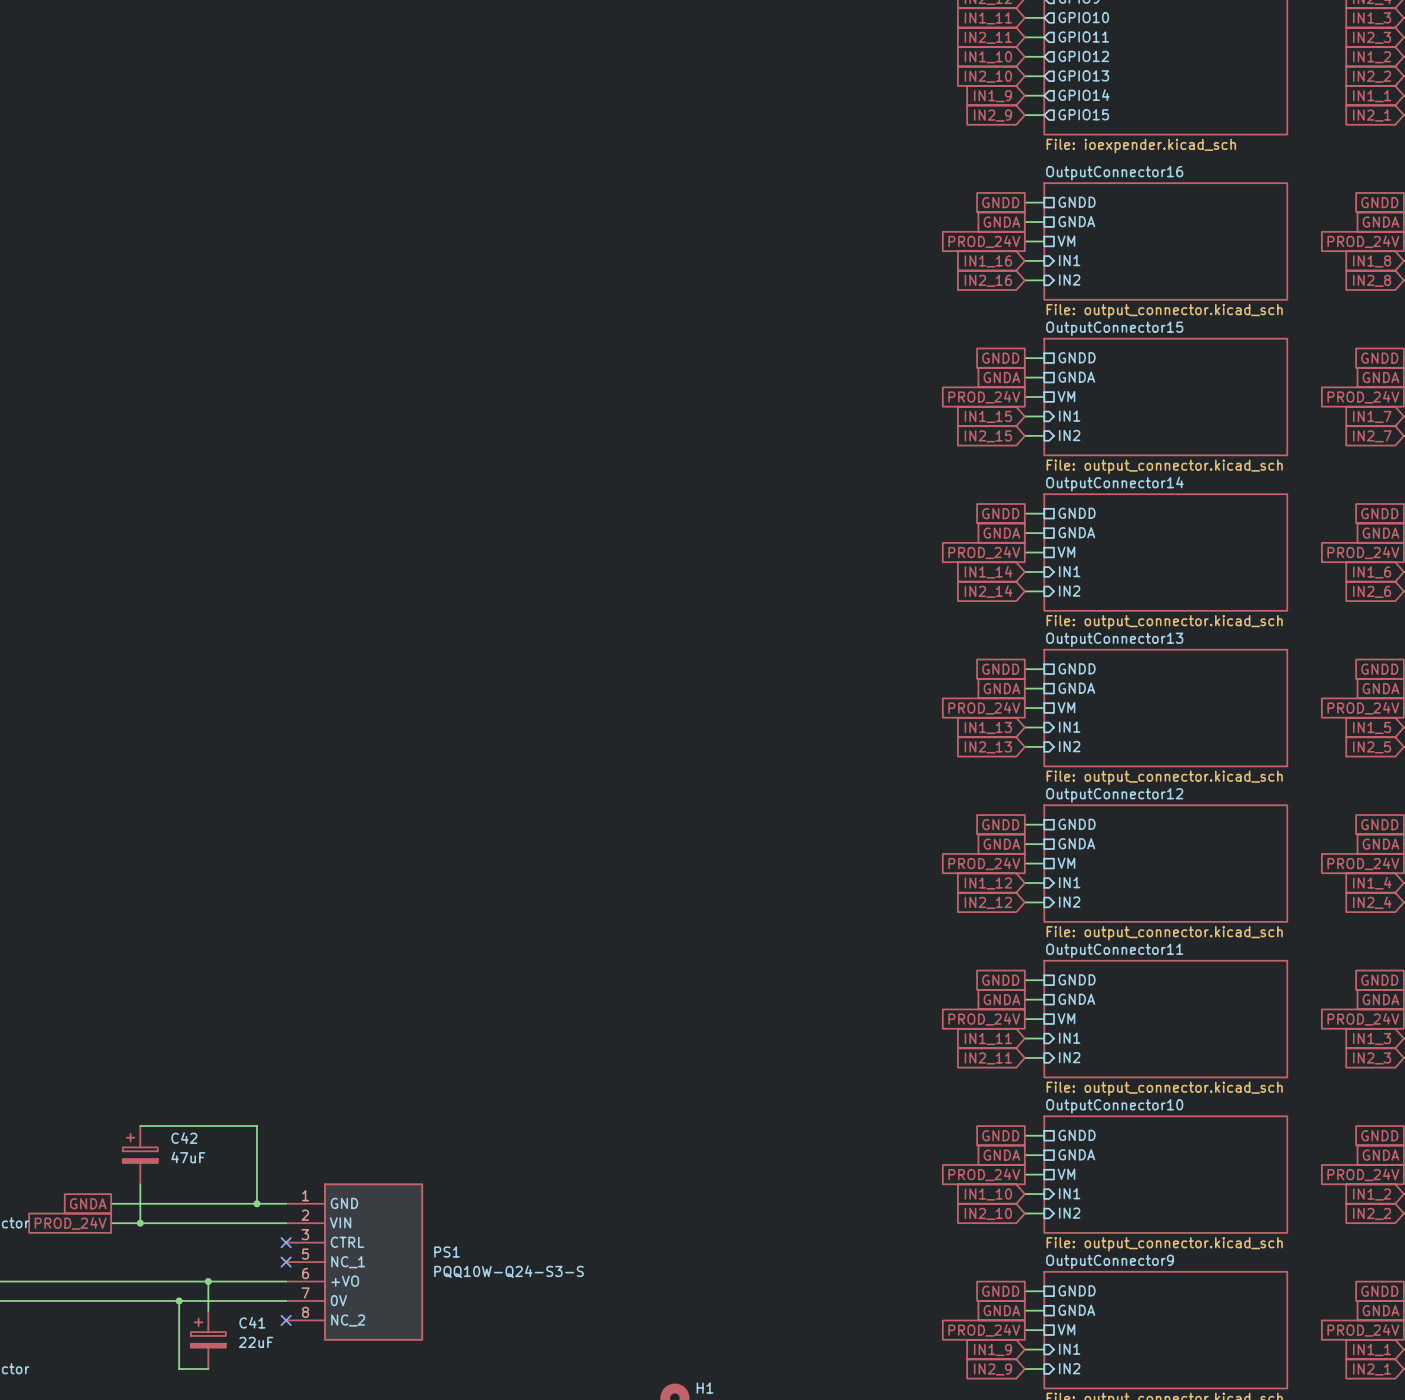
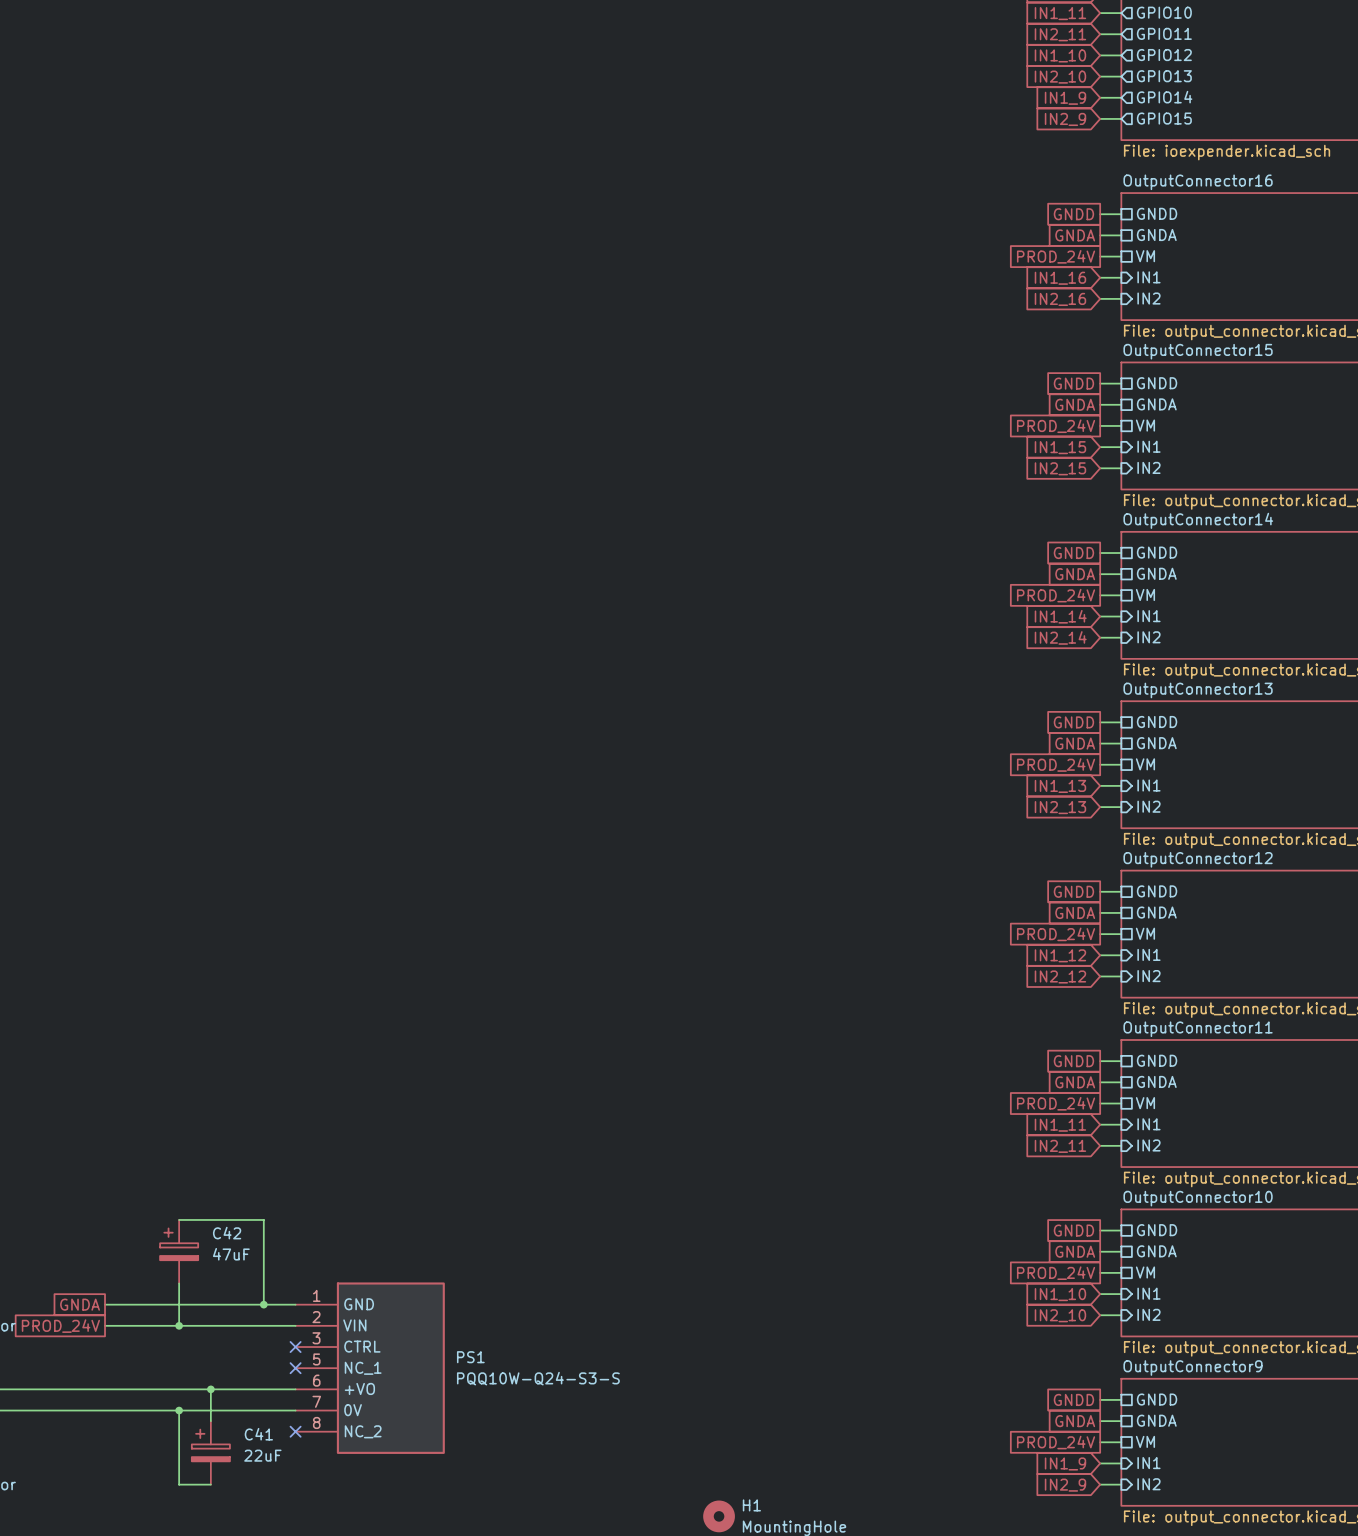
wire: (140, 1126) (179, 1126) -> none
C42 position: (140, 1155) -> (179, 1251)
wire: (140, 1184) (140, 1223) -> (179, 1283) (179, 1325)
junction position: (140, 1223) -> (179, 1325)

